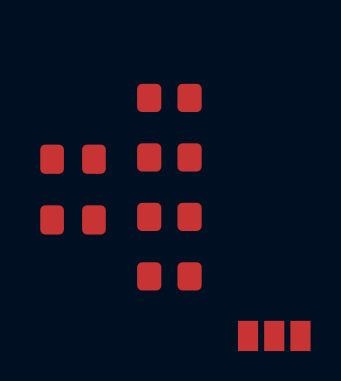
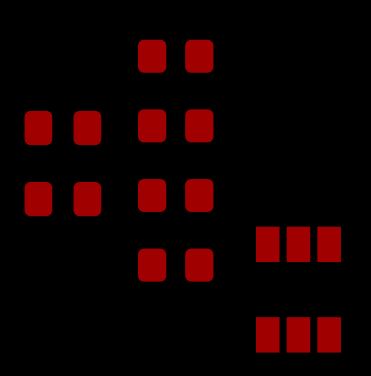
part: none -> (298, 244)

